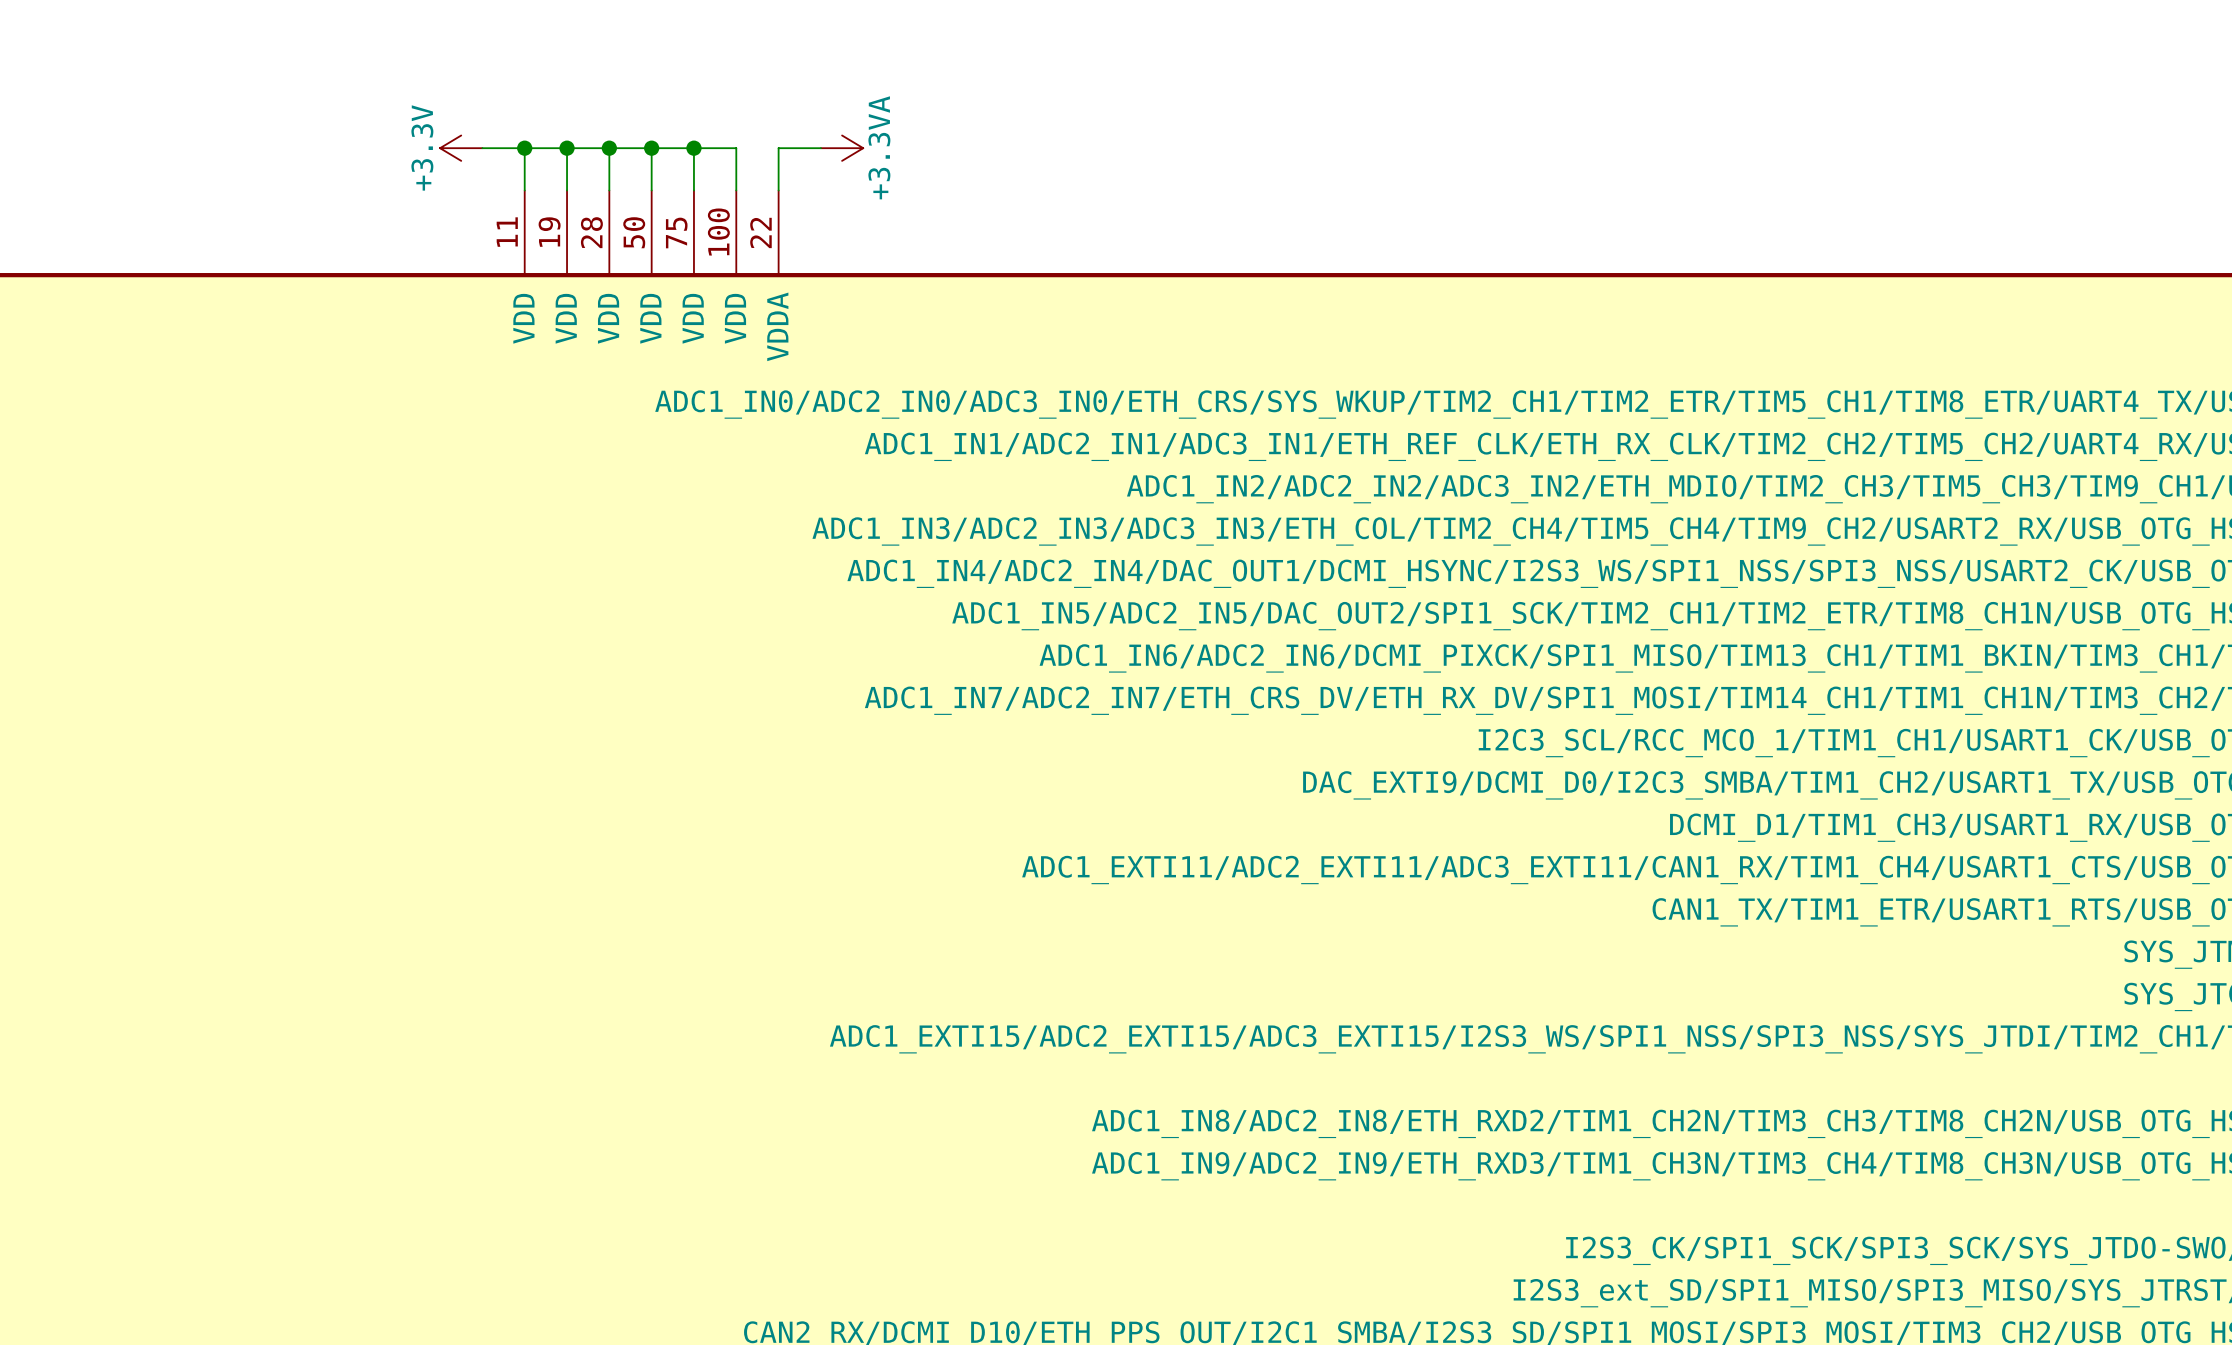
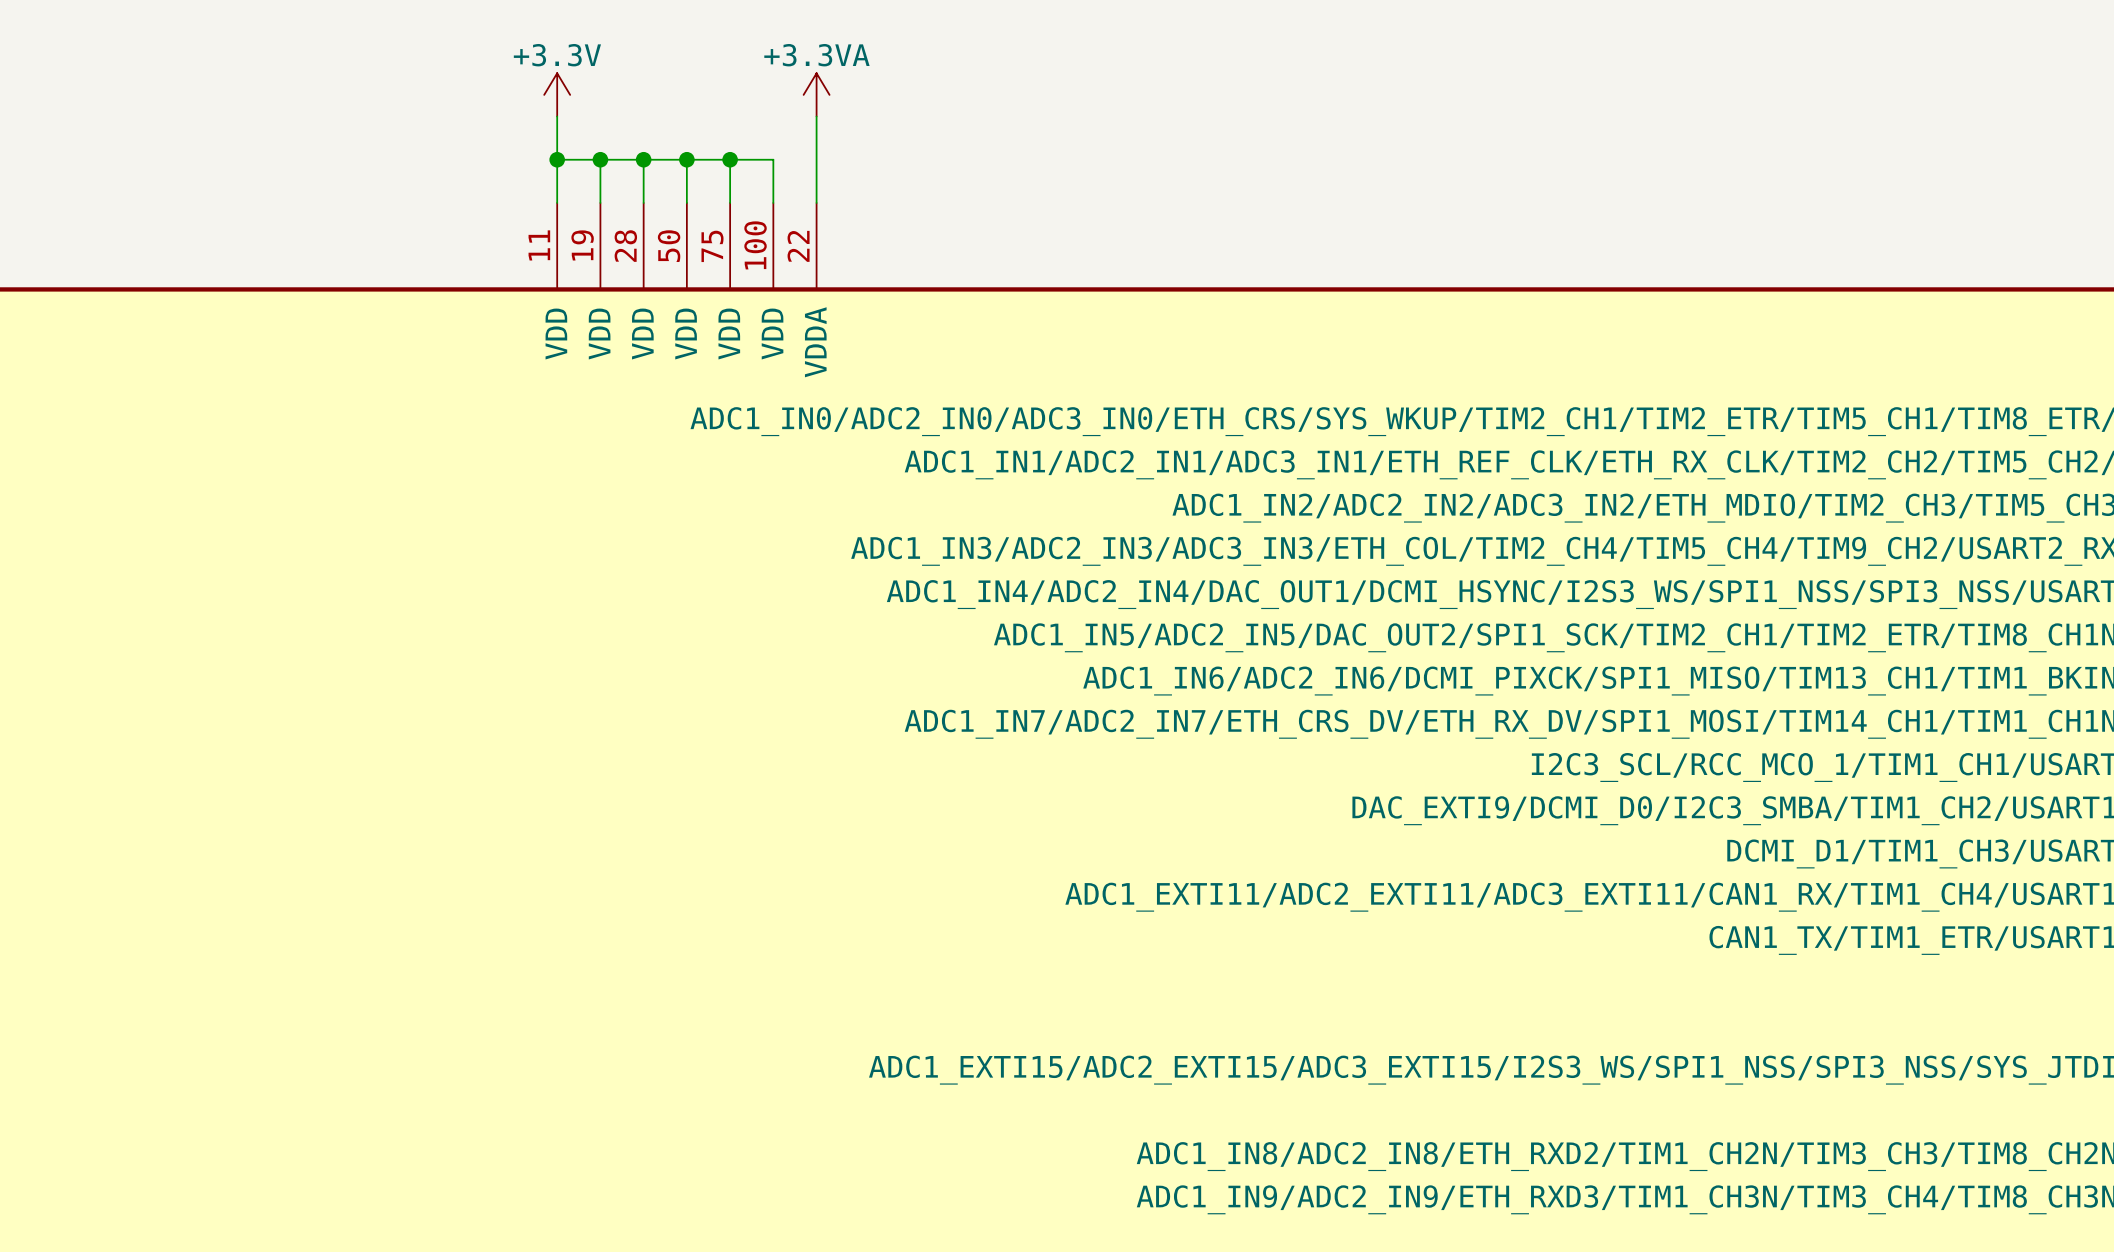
power symbol rotation: 0° (461, 148) -> 90° clockwise (557, 94)
power symbol position: +3.3V (461, 148) -> +3.3V (557, 94)
wire: (482, 148) (524, 148) -> (557, 116) (557, 159)
wire: (778, 148) (820, 148) -> (816, 159) (816, 116)
power symbol rotation: 0° (842, 148) -> 90° counterclockwise (816, 94)
power symbol position: +3.3VA (842, 148) -> +3.3VA (816, 94)

